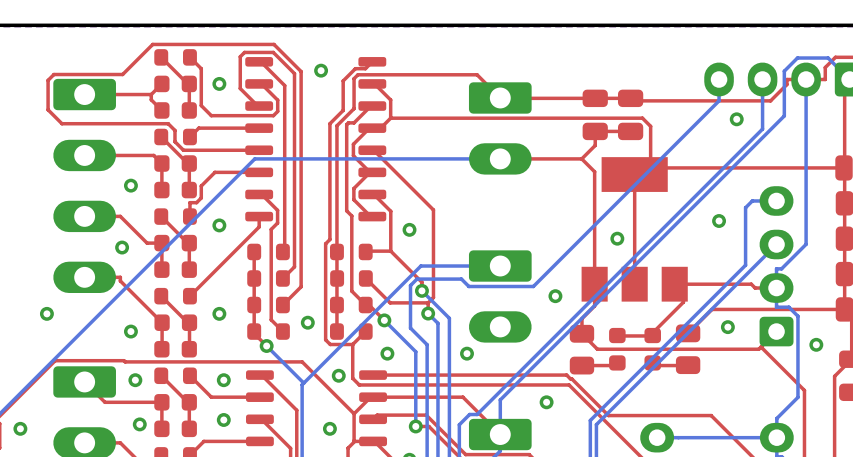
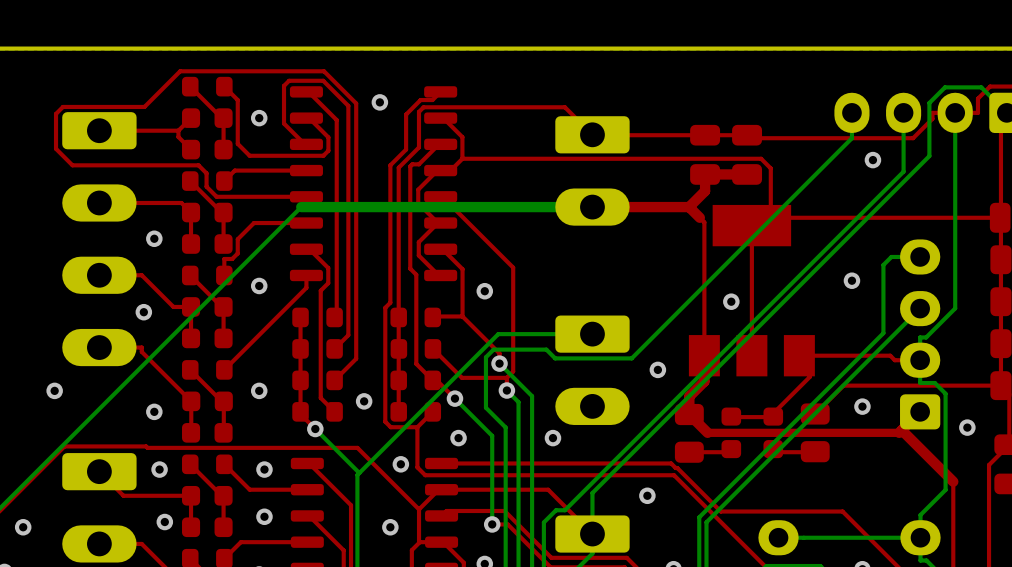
top track width: thin (630, 131) (595, 131) (595, 145) (581, 158) -> thick (747, 174) (705, 174) (705, 191) (689, 207)
bottom track width: thin (500, 158) (254, 158) -> thick (592, 207) (301, 207)
top track width: thin (581, 158) (500, 158) -> thick (689, 207) (592, 207)
top track width: thin (581, 158) (590, 167) -> thick (689, 207) (699, 217)
top track width: thin (594, 284) (594, 306) (581, 318) (581, 333) (597, 349) (758, 349) (776, 331) -> thick (704, 355) (704, 381) (689, 396) (689, 414) (707, 432) (899, 432) (920, 411)
top track width: thin (761, 347) (804, 390) -> thick (901, 430) (953, 481)

